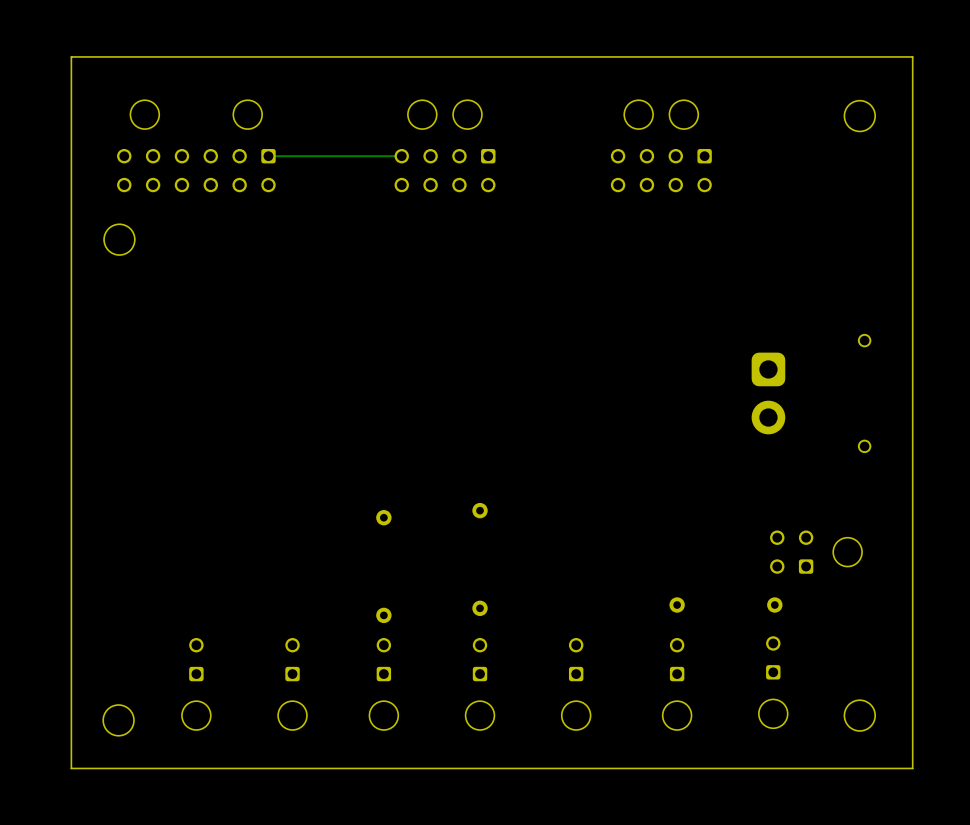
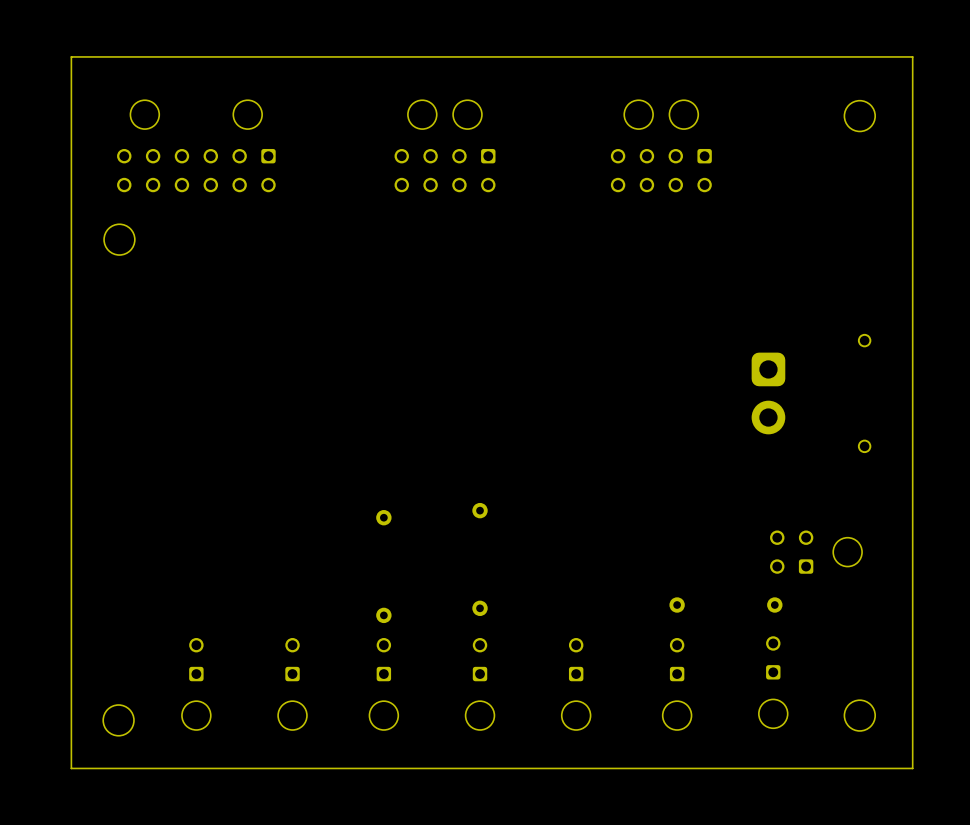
track: (401, 156) (268, 156) -> none

